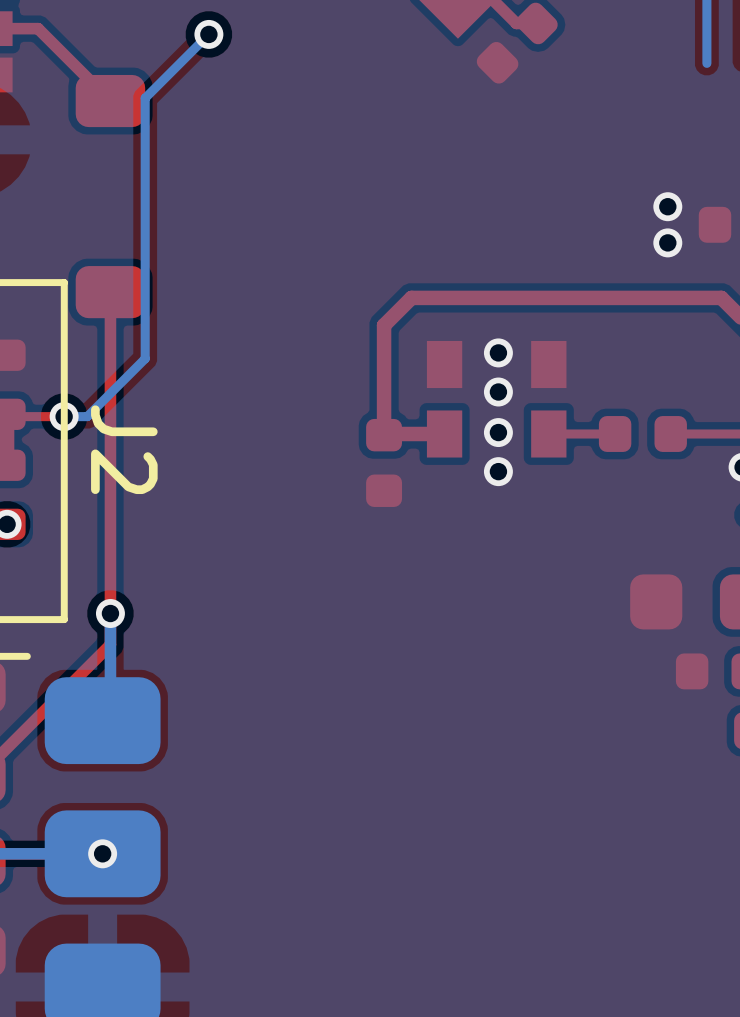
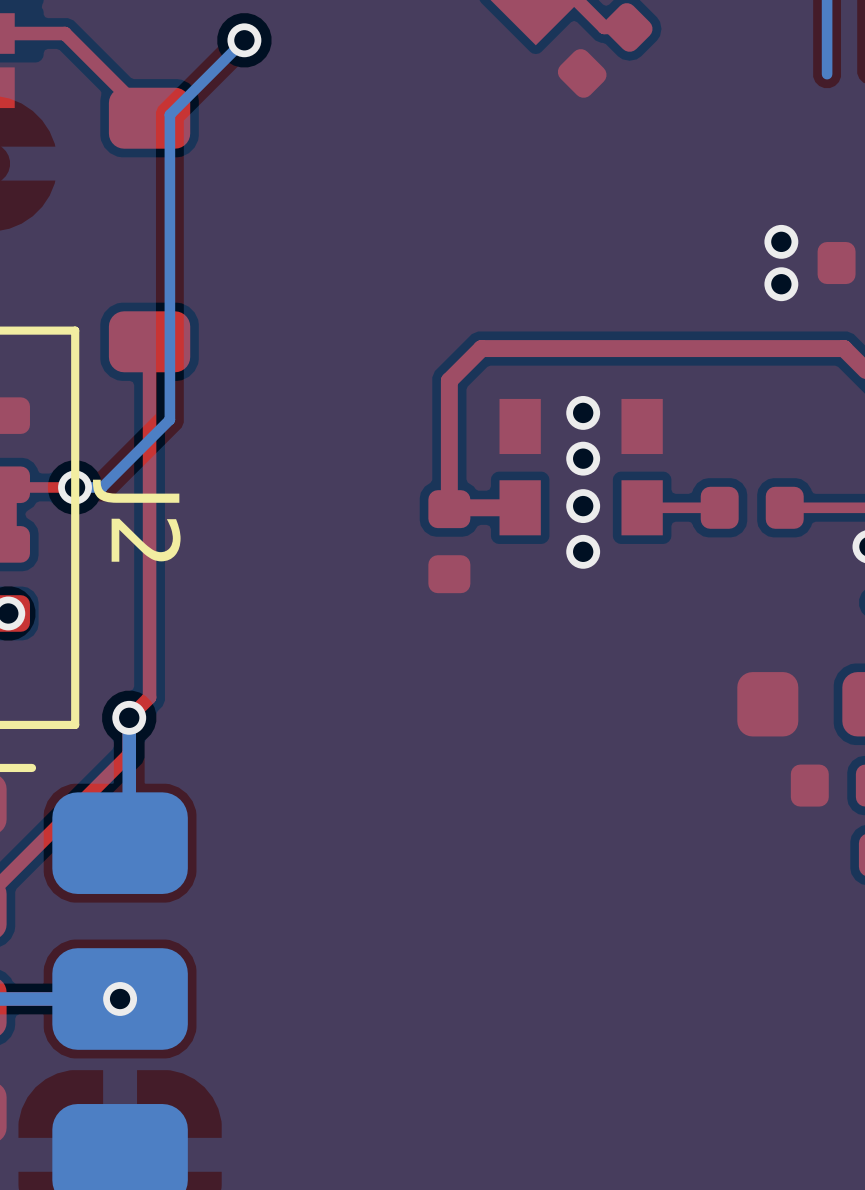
top track: (38, 28) (110, 101) -> (44, 33) (64, 33) (149, 118)
part position: (110, 196) -> (149, 230)
top track: (110, 292) (110, 613) -> (149, 341) (149, 697) (129, 717)

